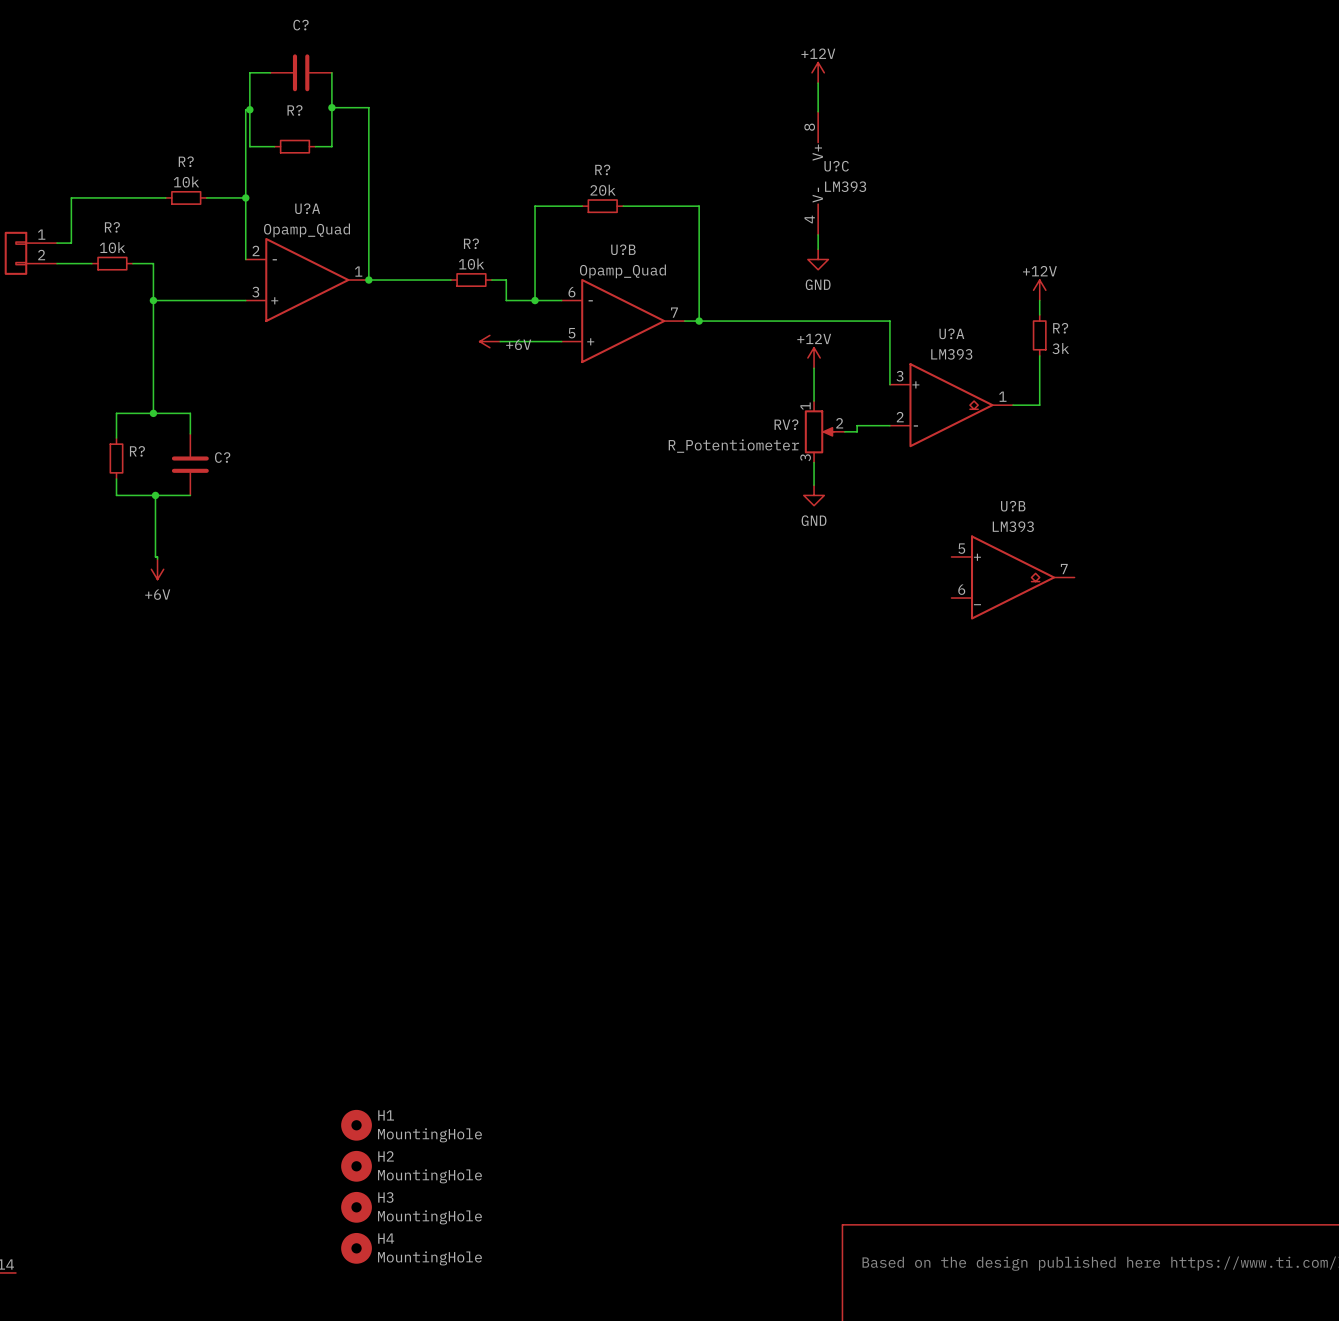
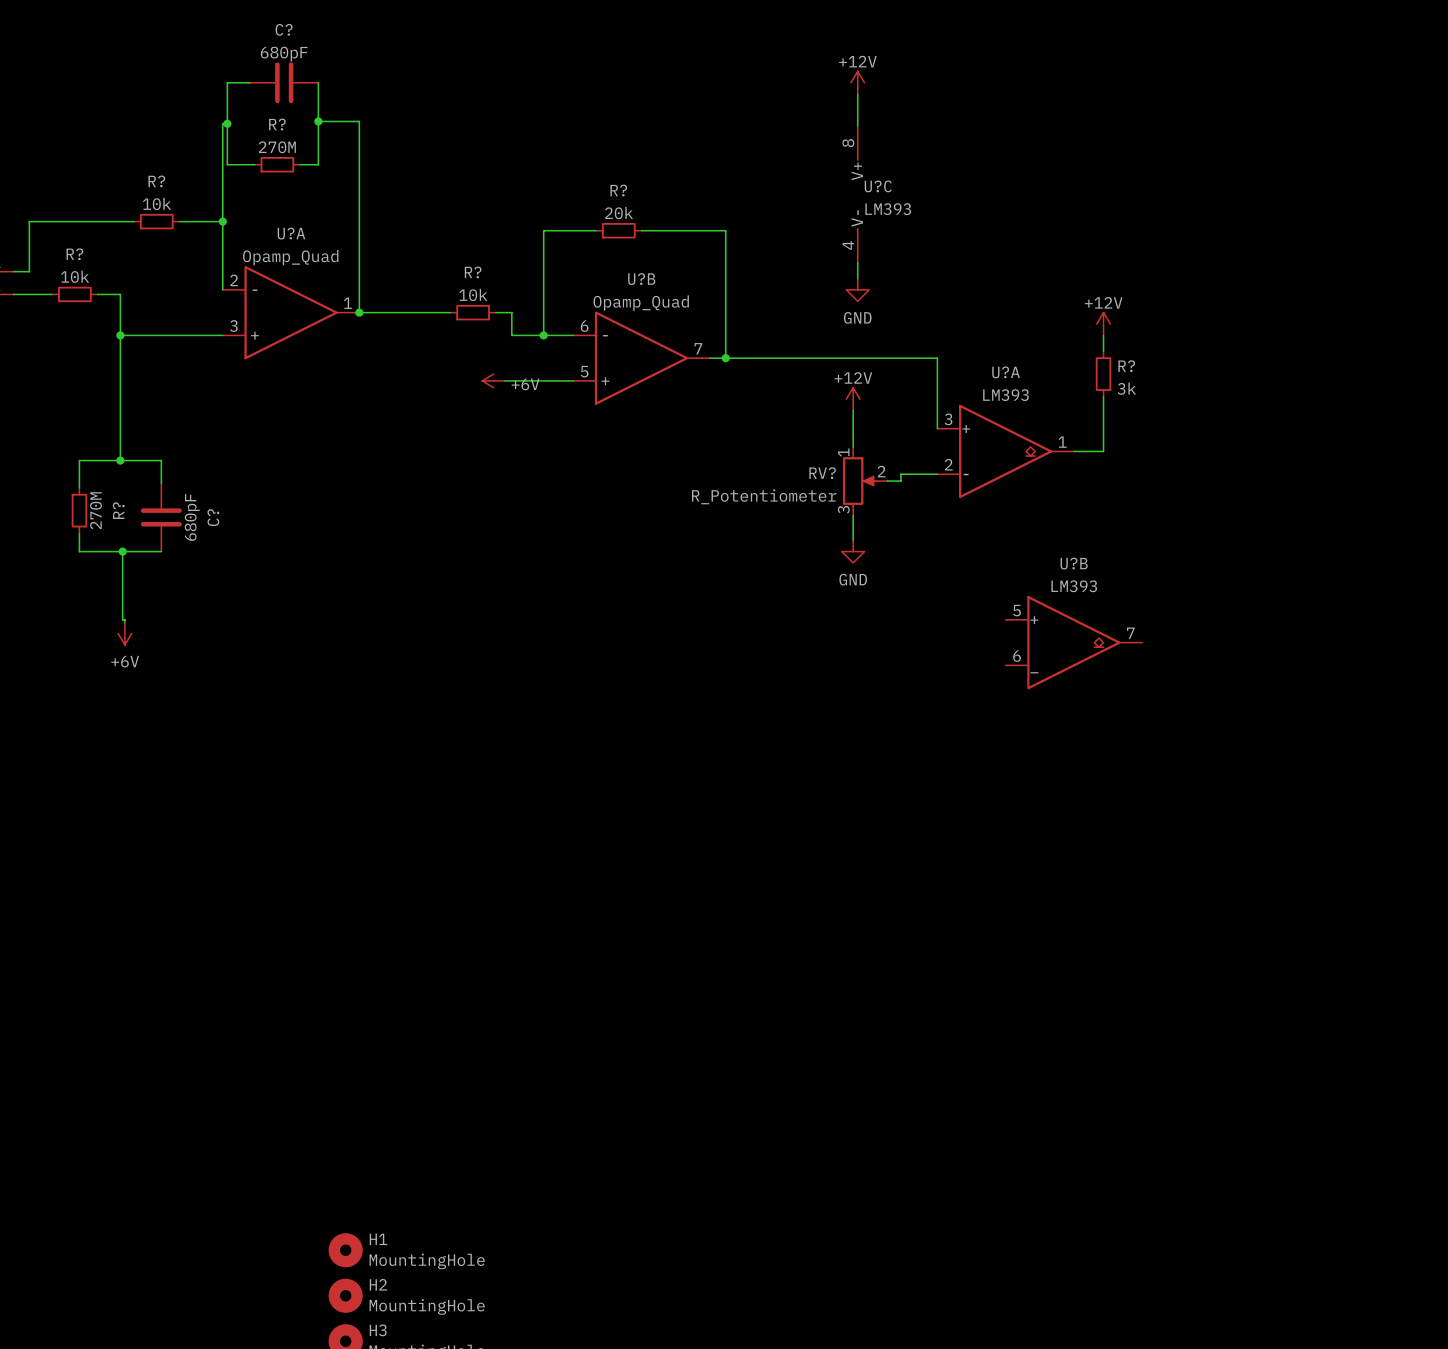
C? value: none -> 680pF (284, 54)
R? value: none -> 270M (277, 147)
R? name rotation: 0° (137, 451) -> 90° counterclockwise (118, 510)
C? name rotation: 0° (222, 457) -> 90° counterclockwise (213, 517)
R? value: none -> 270M (96, 510)
C? value: none -> 680pF (192, 517)

